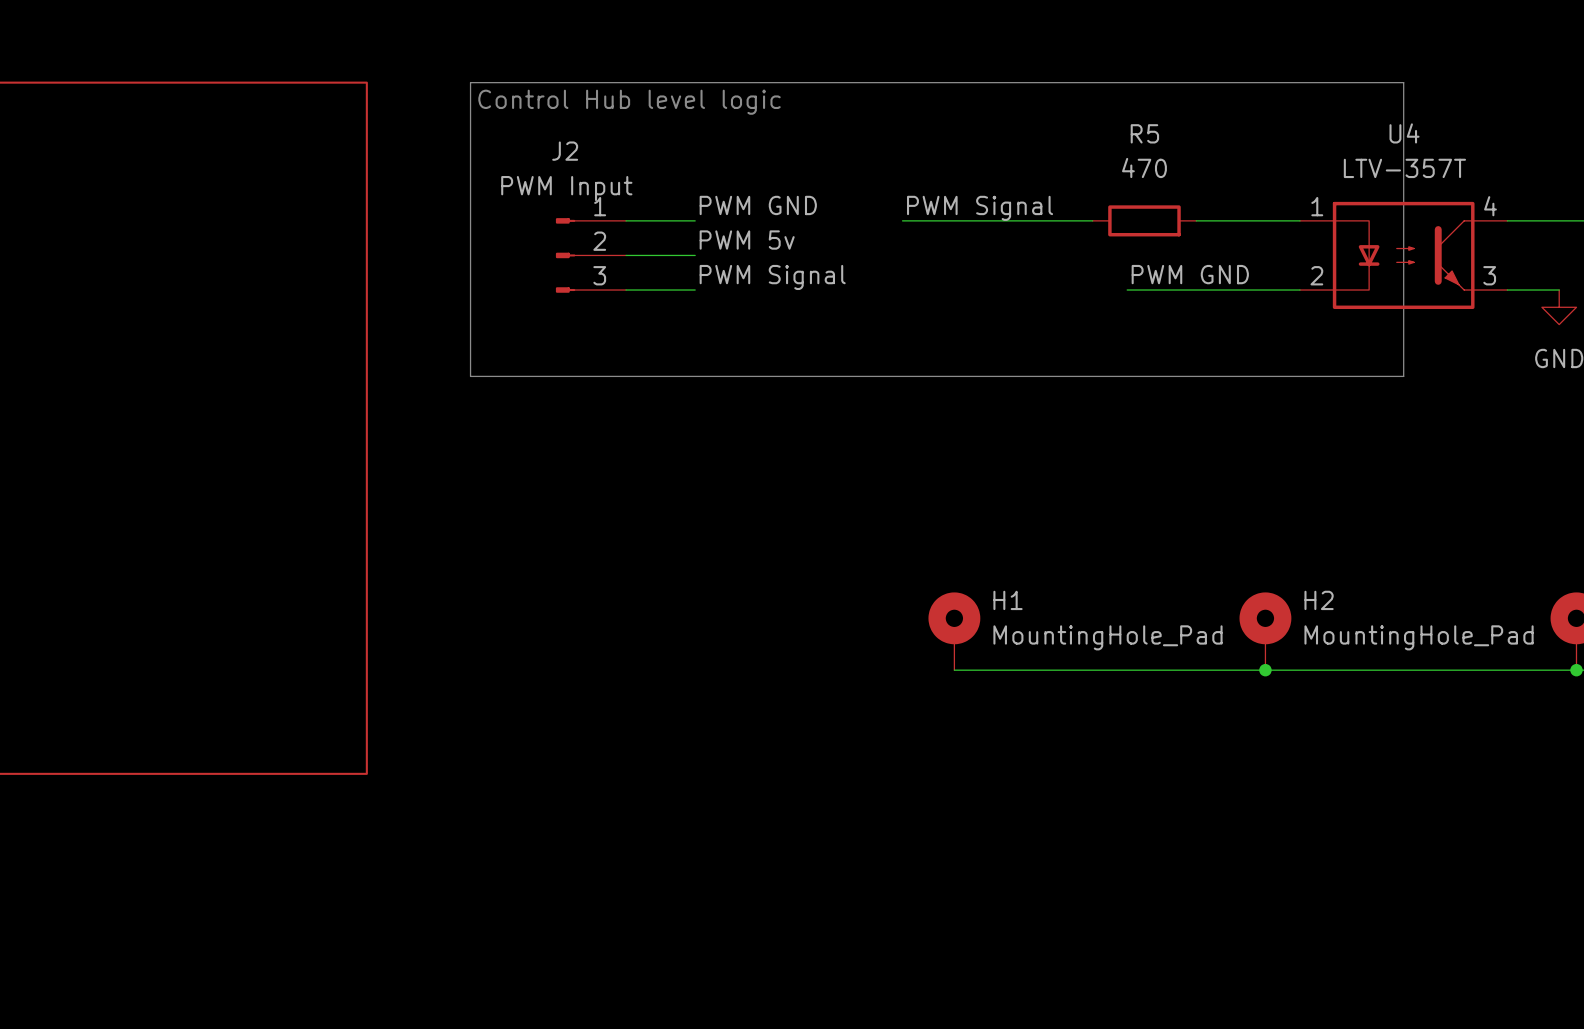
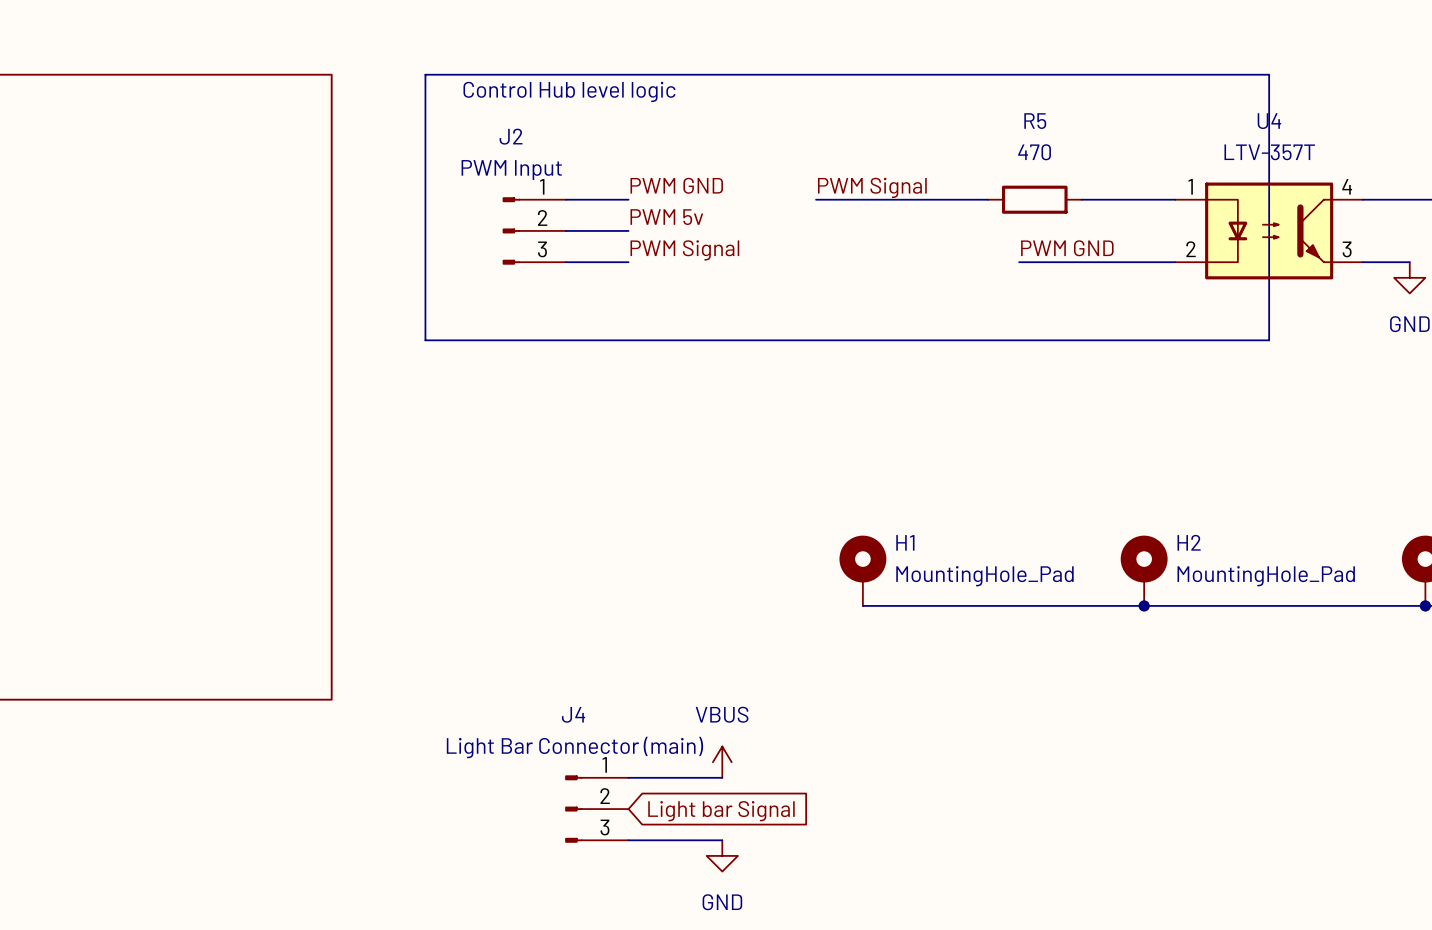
power symbol: none -> VBUS (722, 762)
wire: none -> (628, 777) (722, 777)
J4: none -> Light Bar Connector (main) (596, 809)
global label: none -> Light bar Signal (721, 811)
wire: none -> (628, 840) (722, 840)
power symbol: none -> GND (722, 855)

